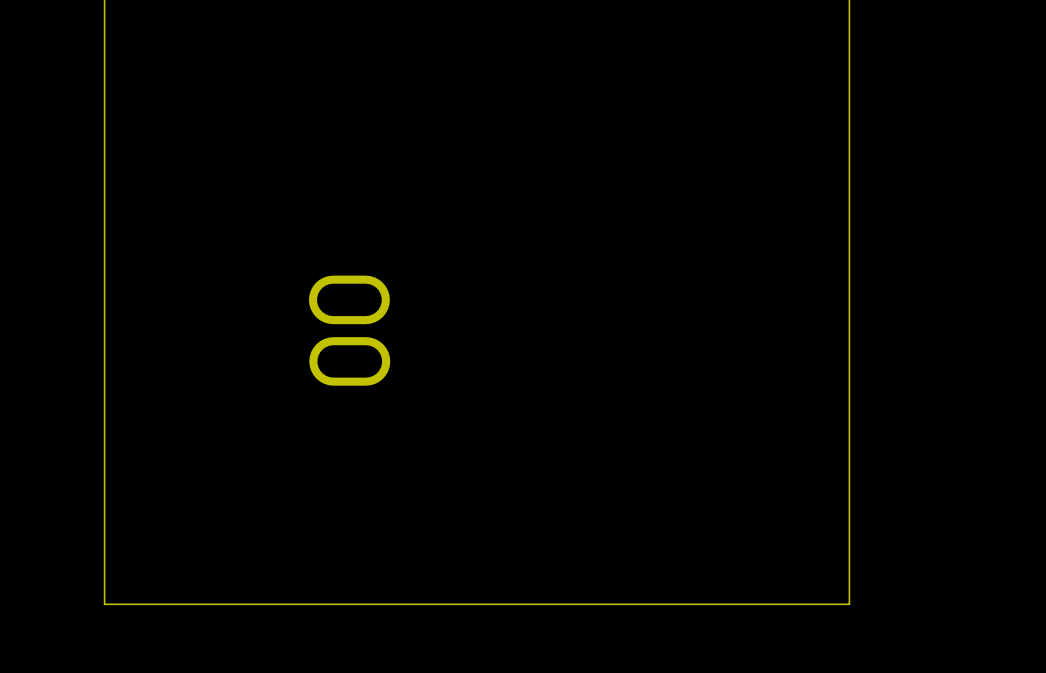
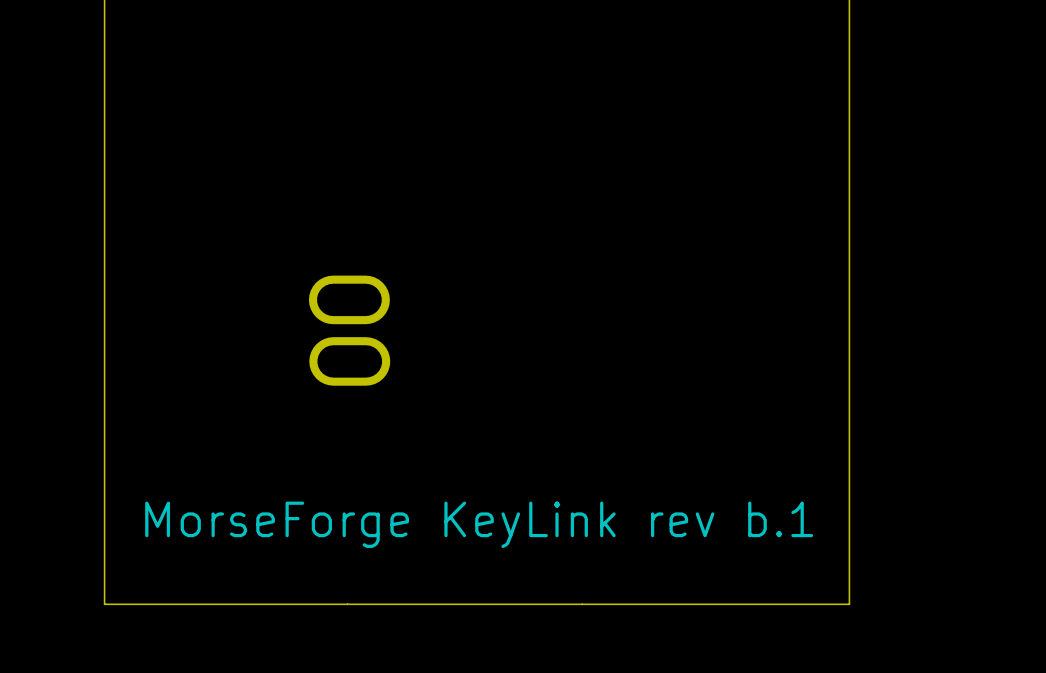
text: none -> MorseForge KeyLink rev b.1 (479, 524)

